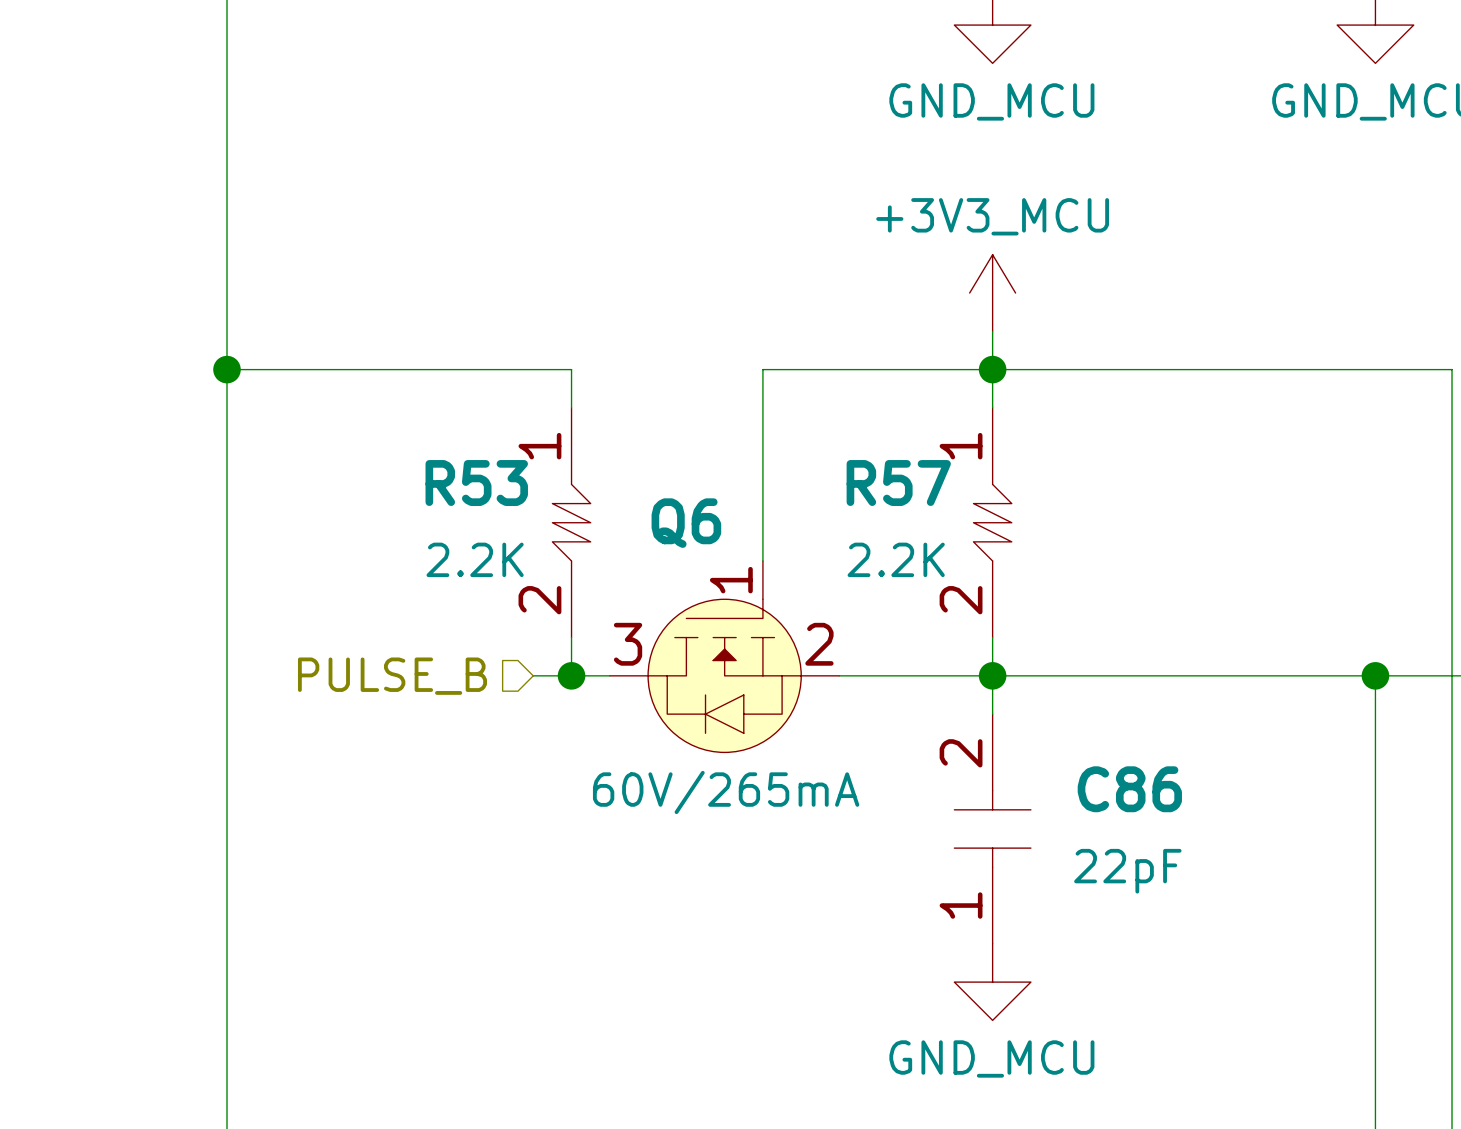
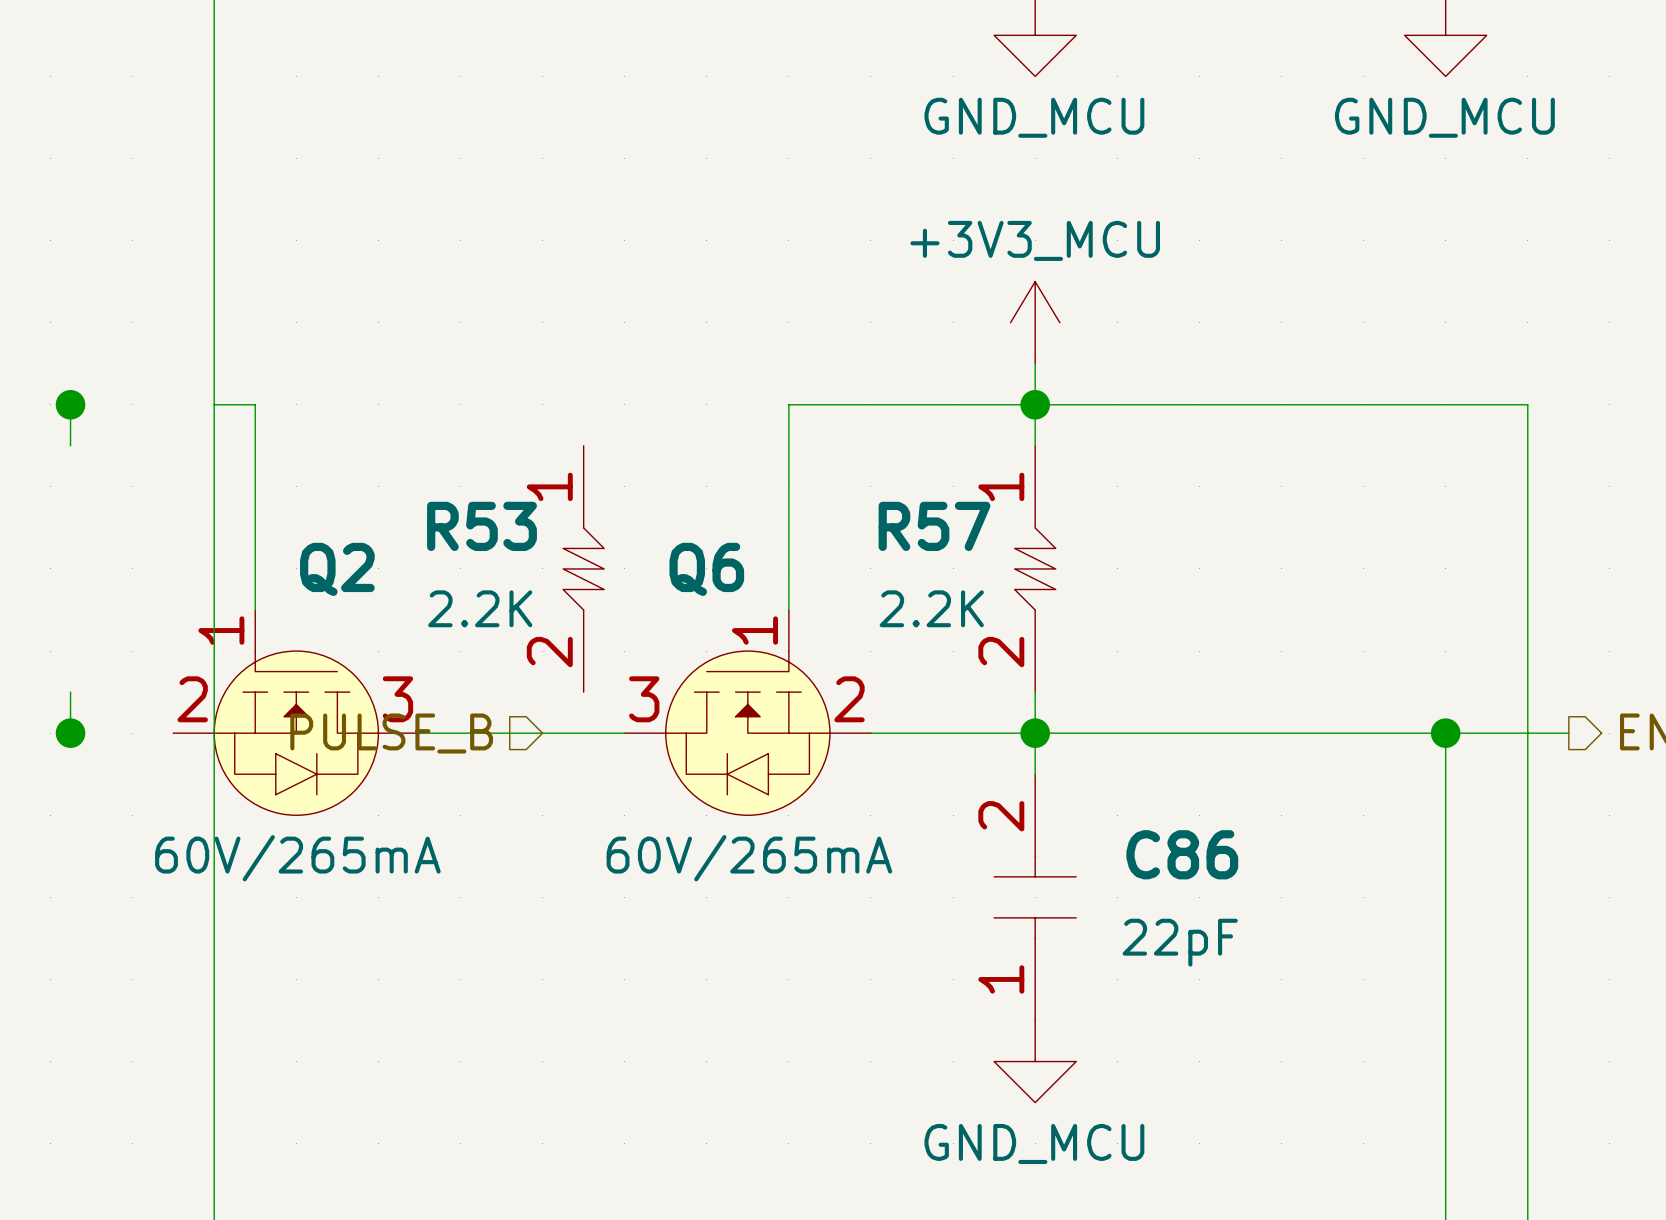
wire: none -> (70, 404) (70, 445)
junction position: (227, 369) -> (70, 404)
wire: (265, 369) (571, 369) (571, 407) -> (255, 404) (255, 610)
wire: (571, 637) (571, 675) -> (70, 692) (70, 733)
Q2: none -> 60V/265mA (296, 712)
junction: none -> (70, 733)
wire: none -> (419, 733) (542, 733)
junction: (571, 675) -> none

